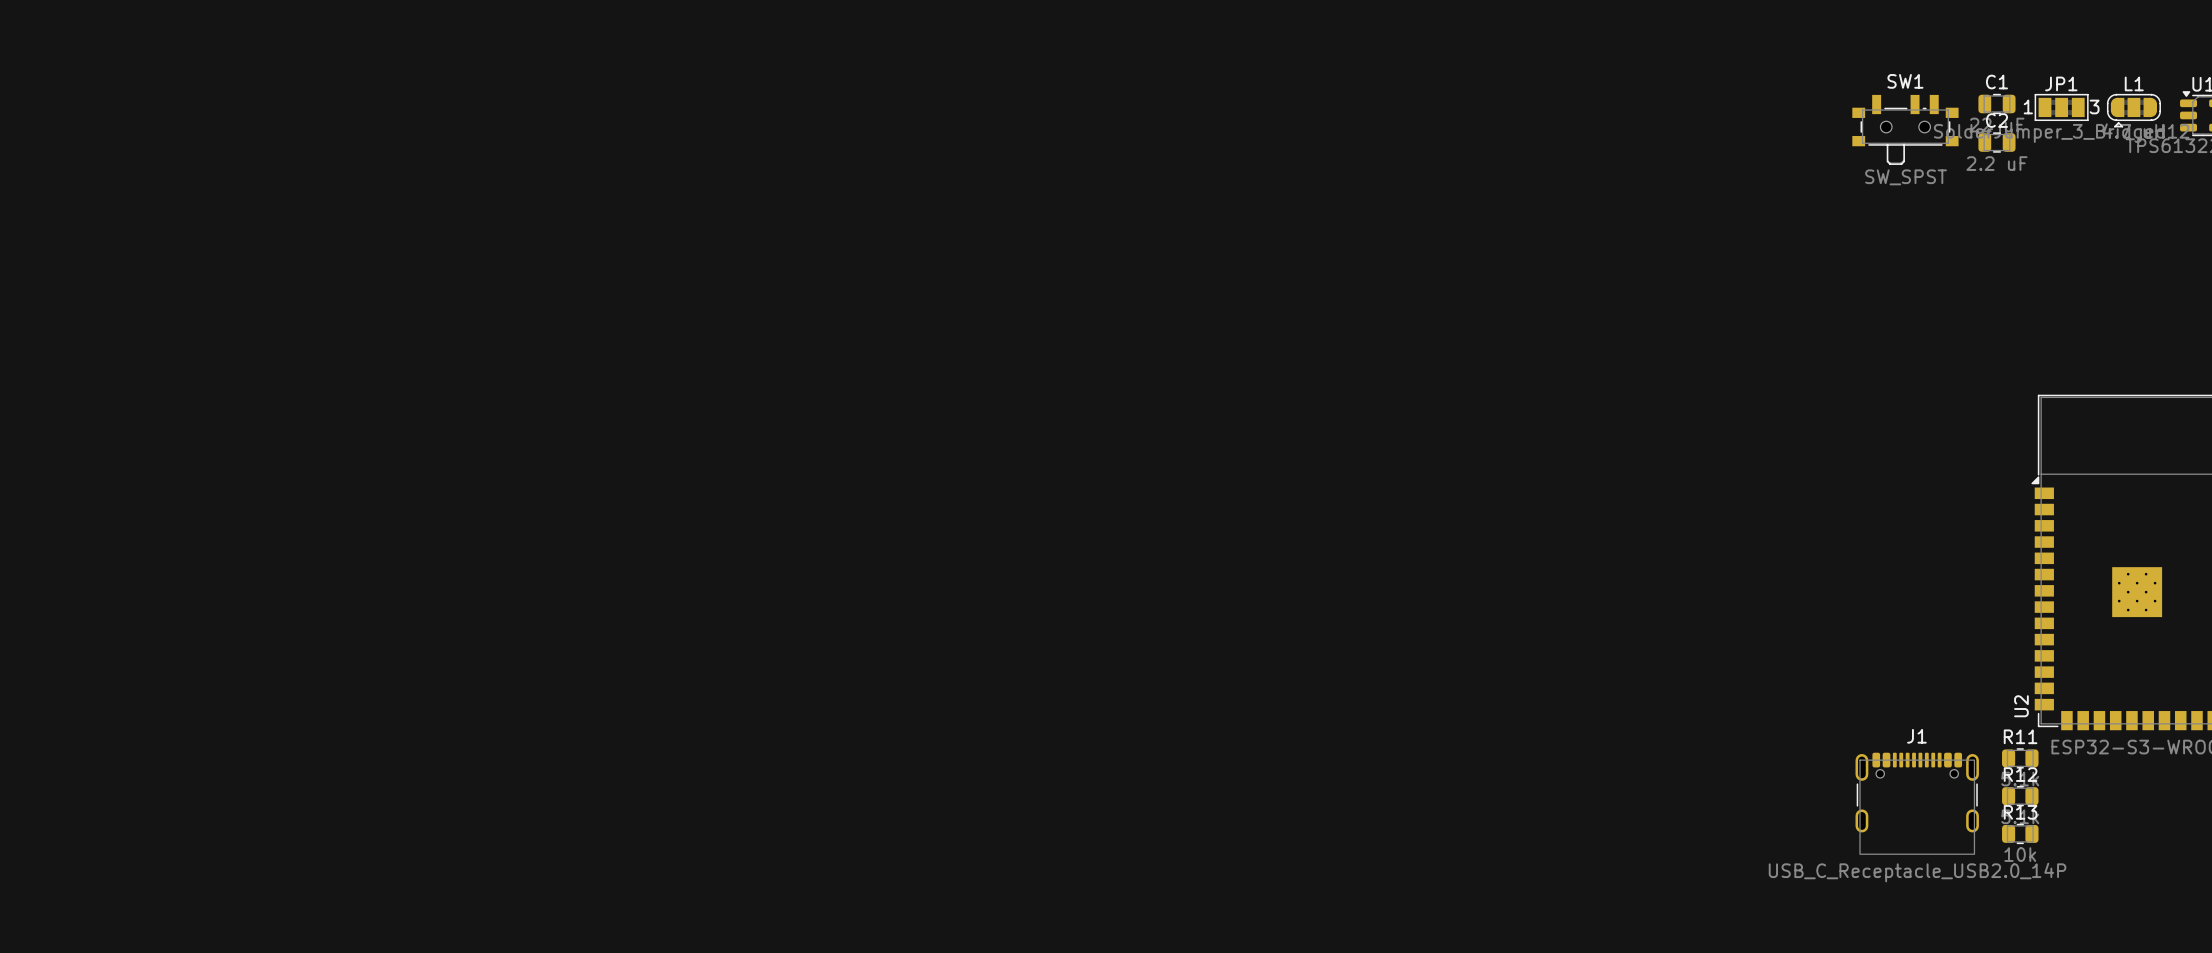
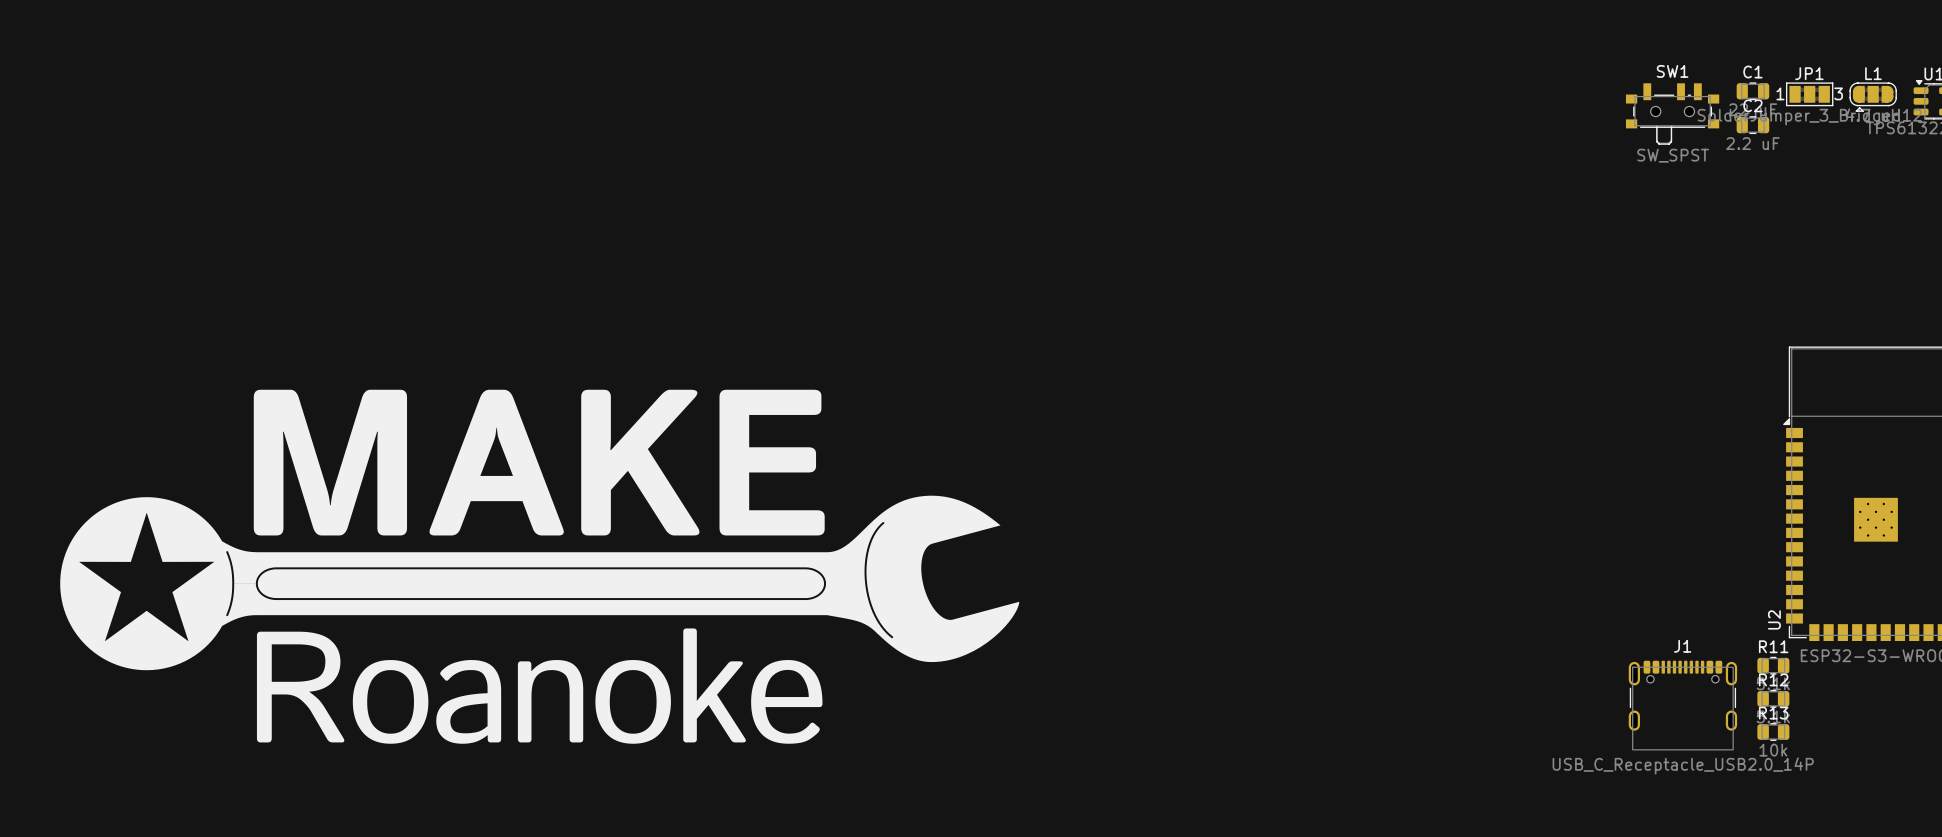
drawing: none -> [60, 389, 1020, 744]

